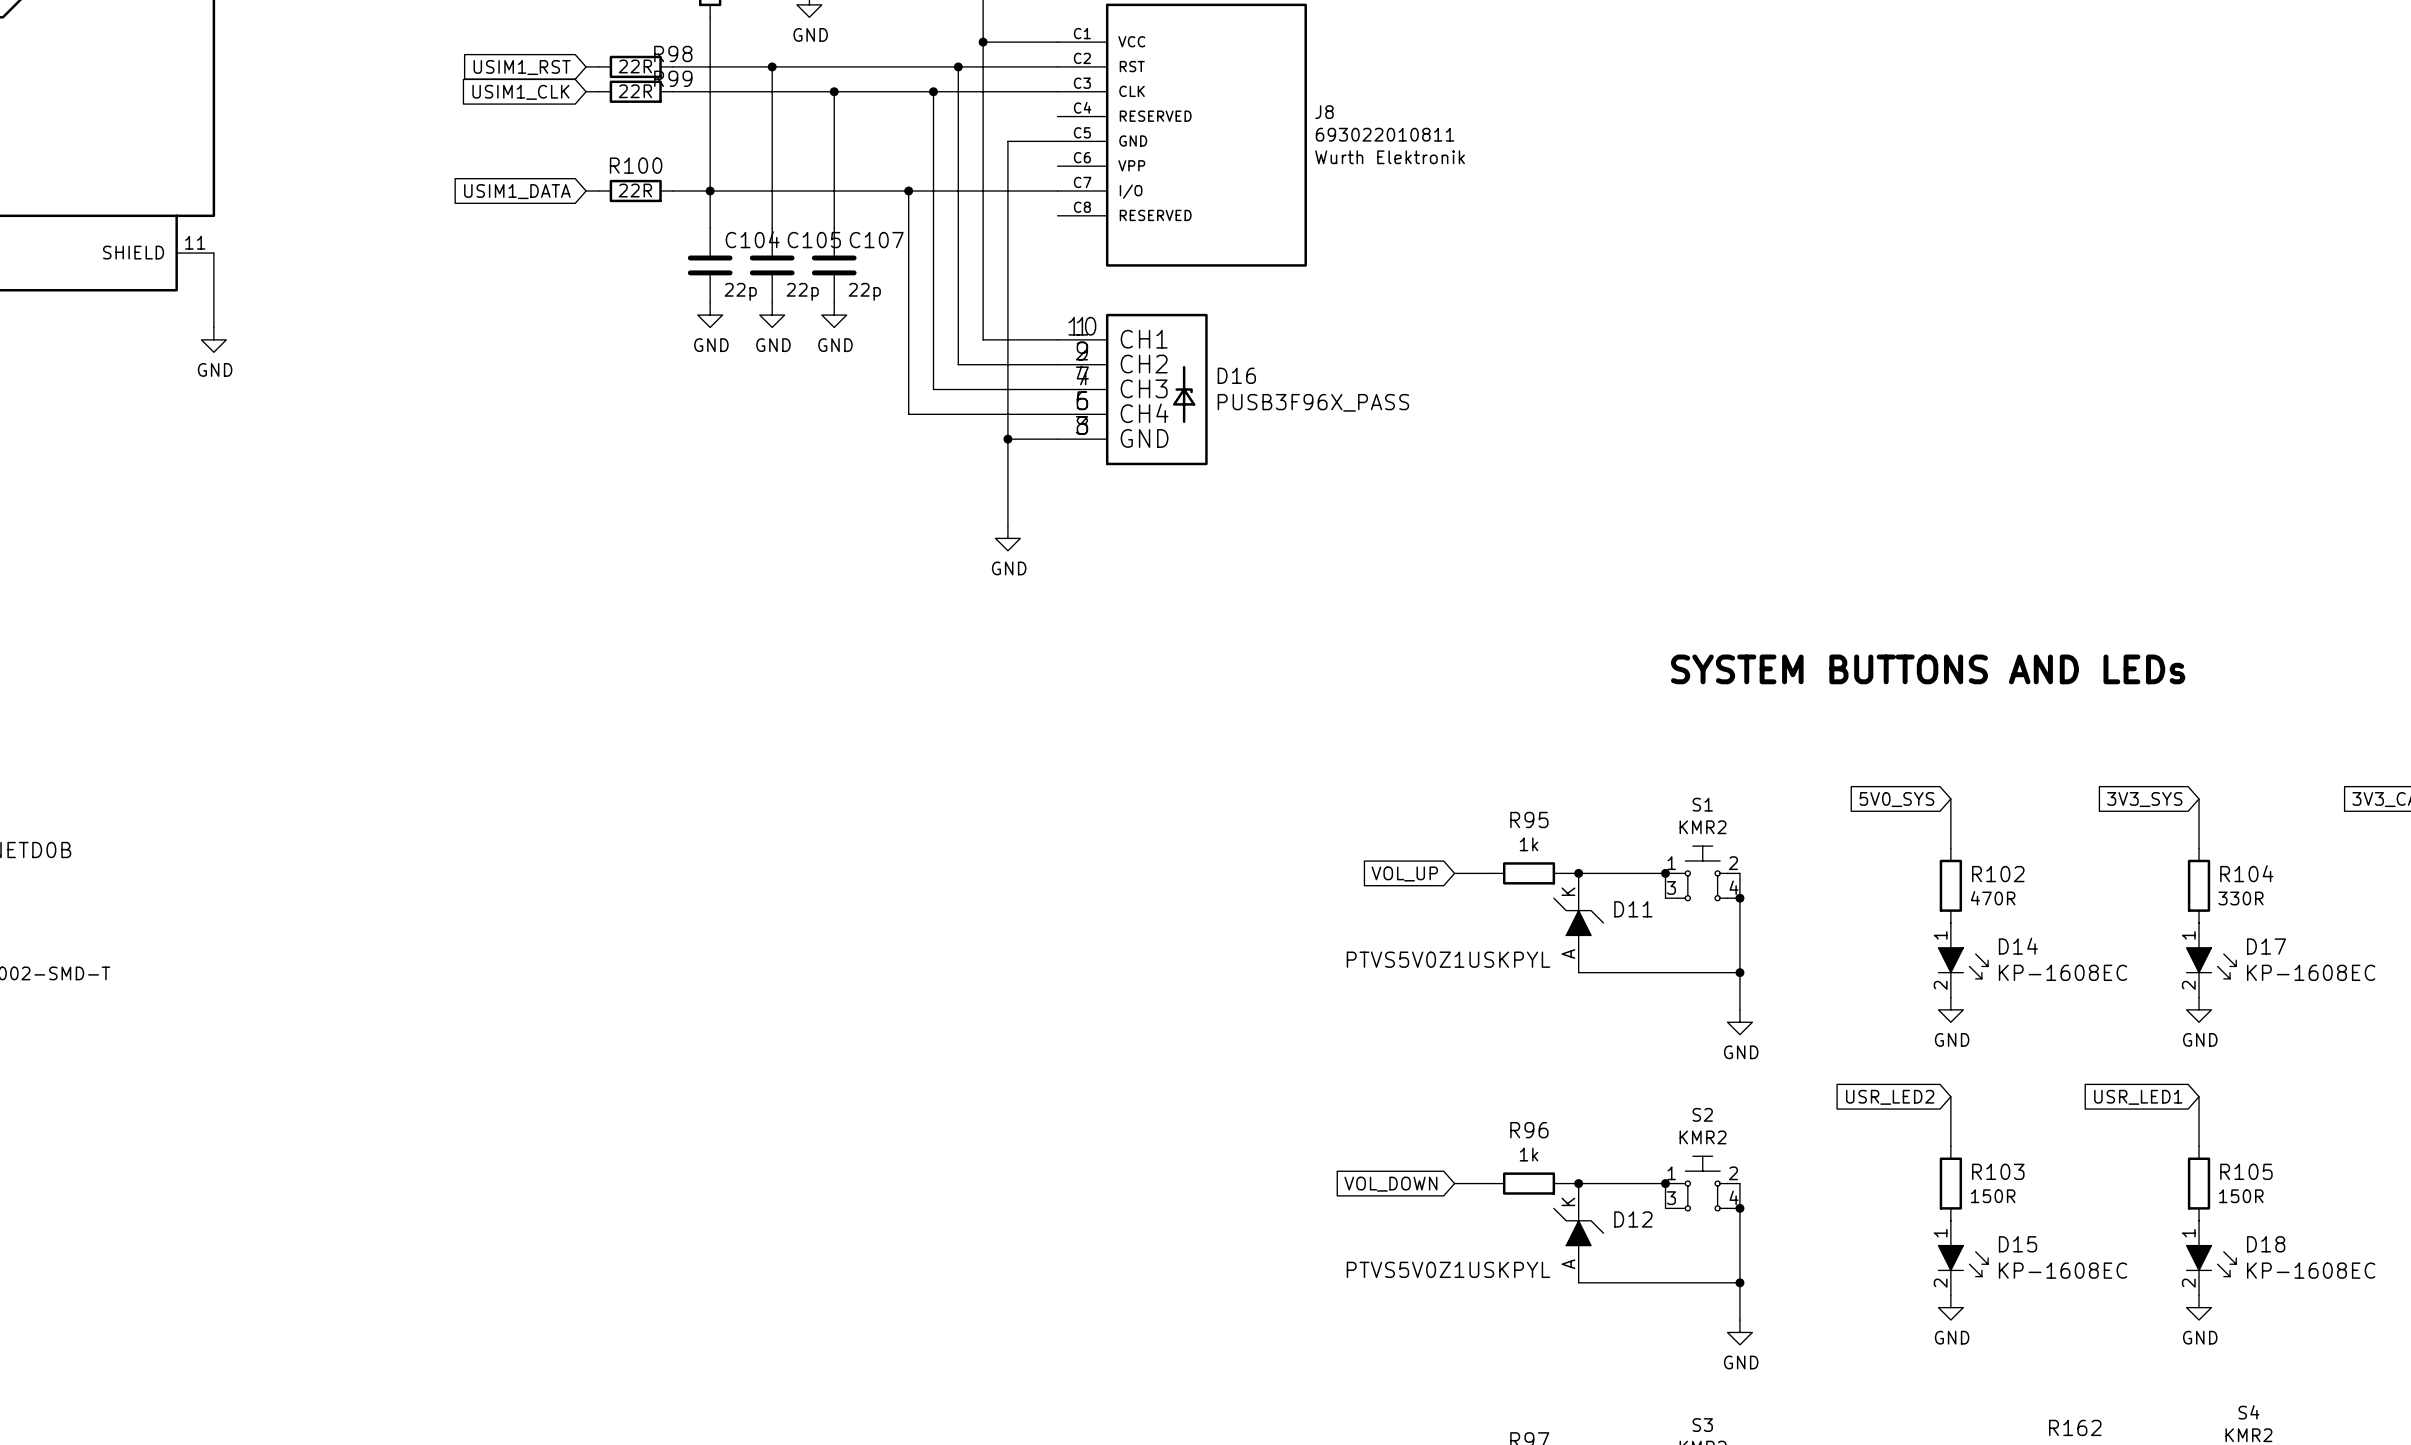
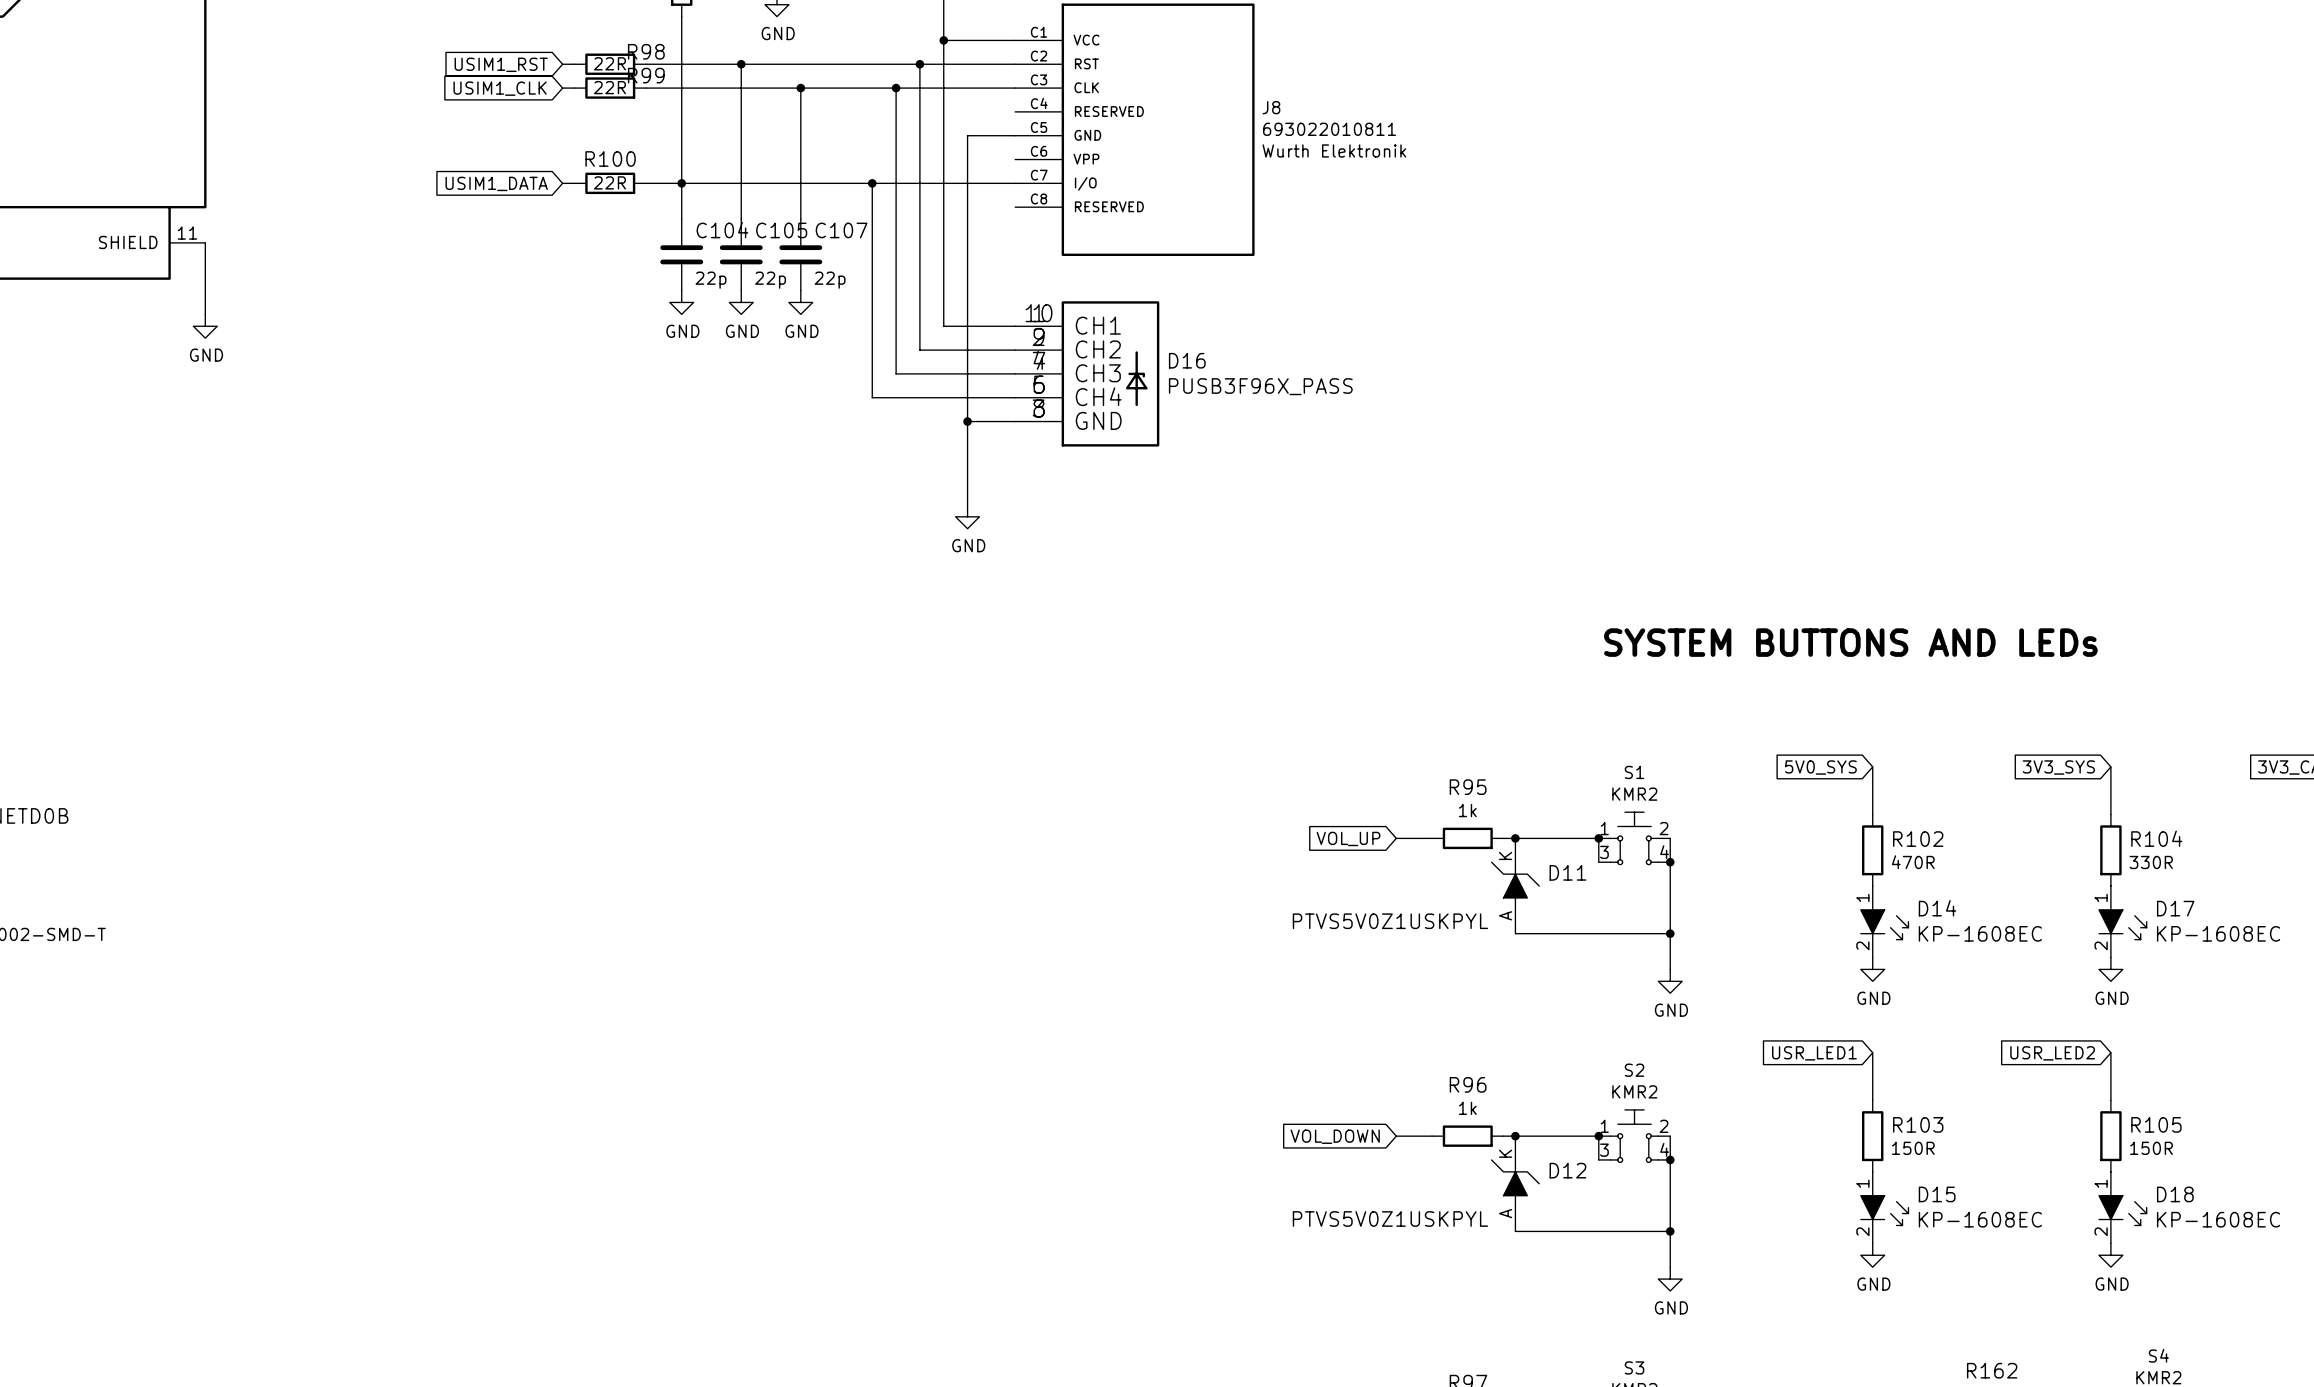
global label: USR_LED2 (1890, 1097) -> USR_LED1 (1814, 1053)
global label: USR_LED1 (2138, 1097) -> USR_LED2 (2052, 1053)

